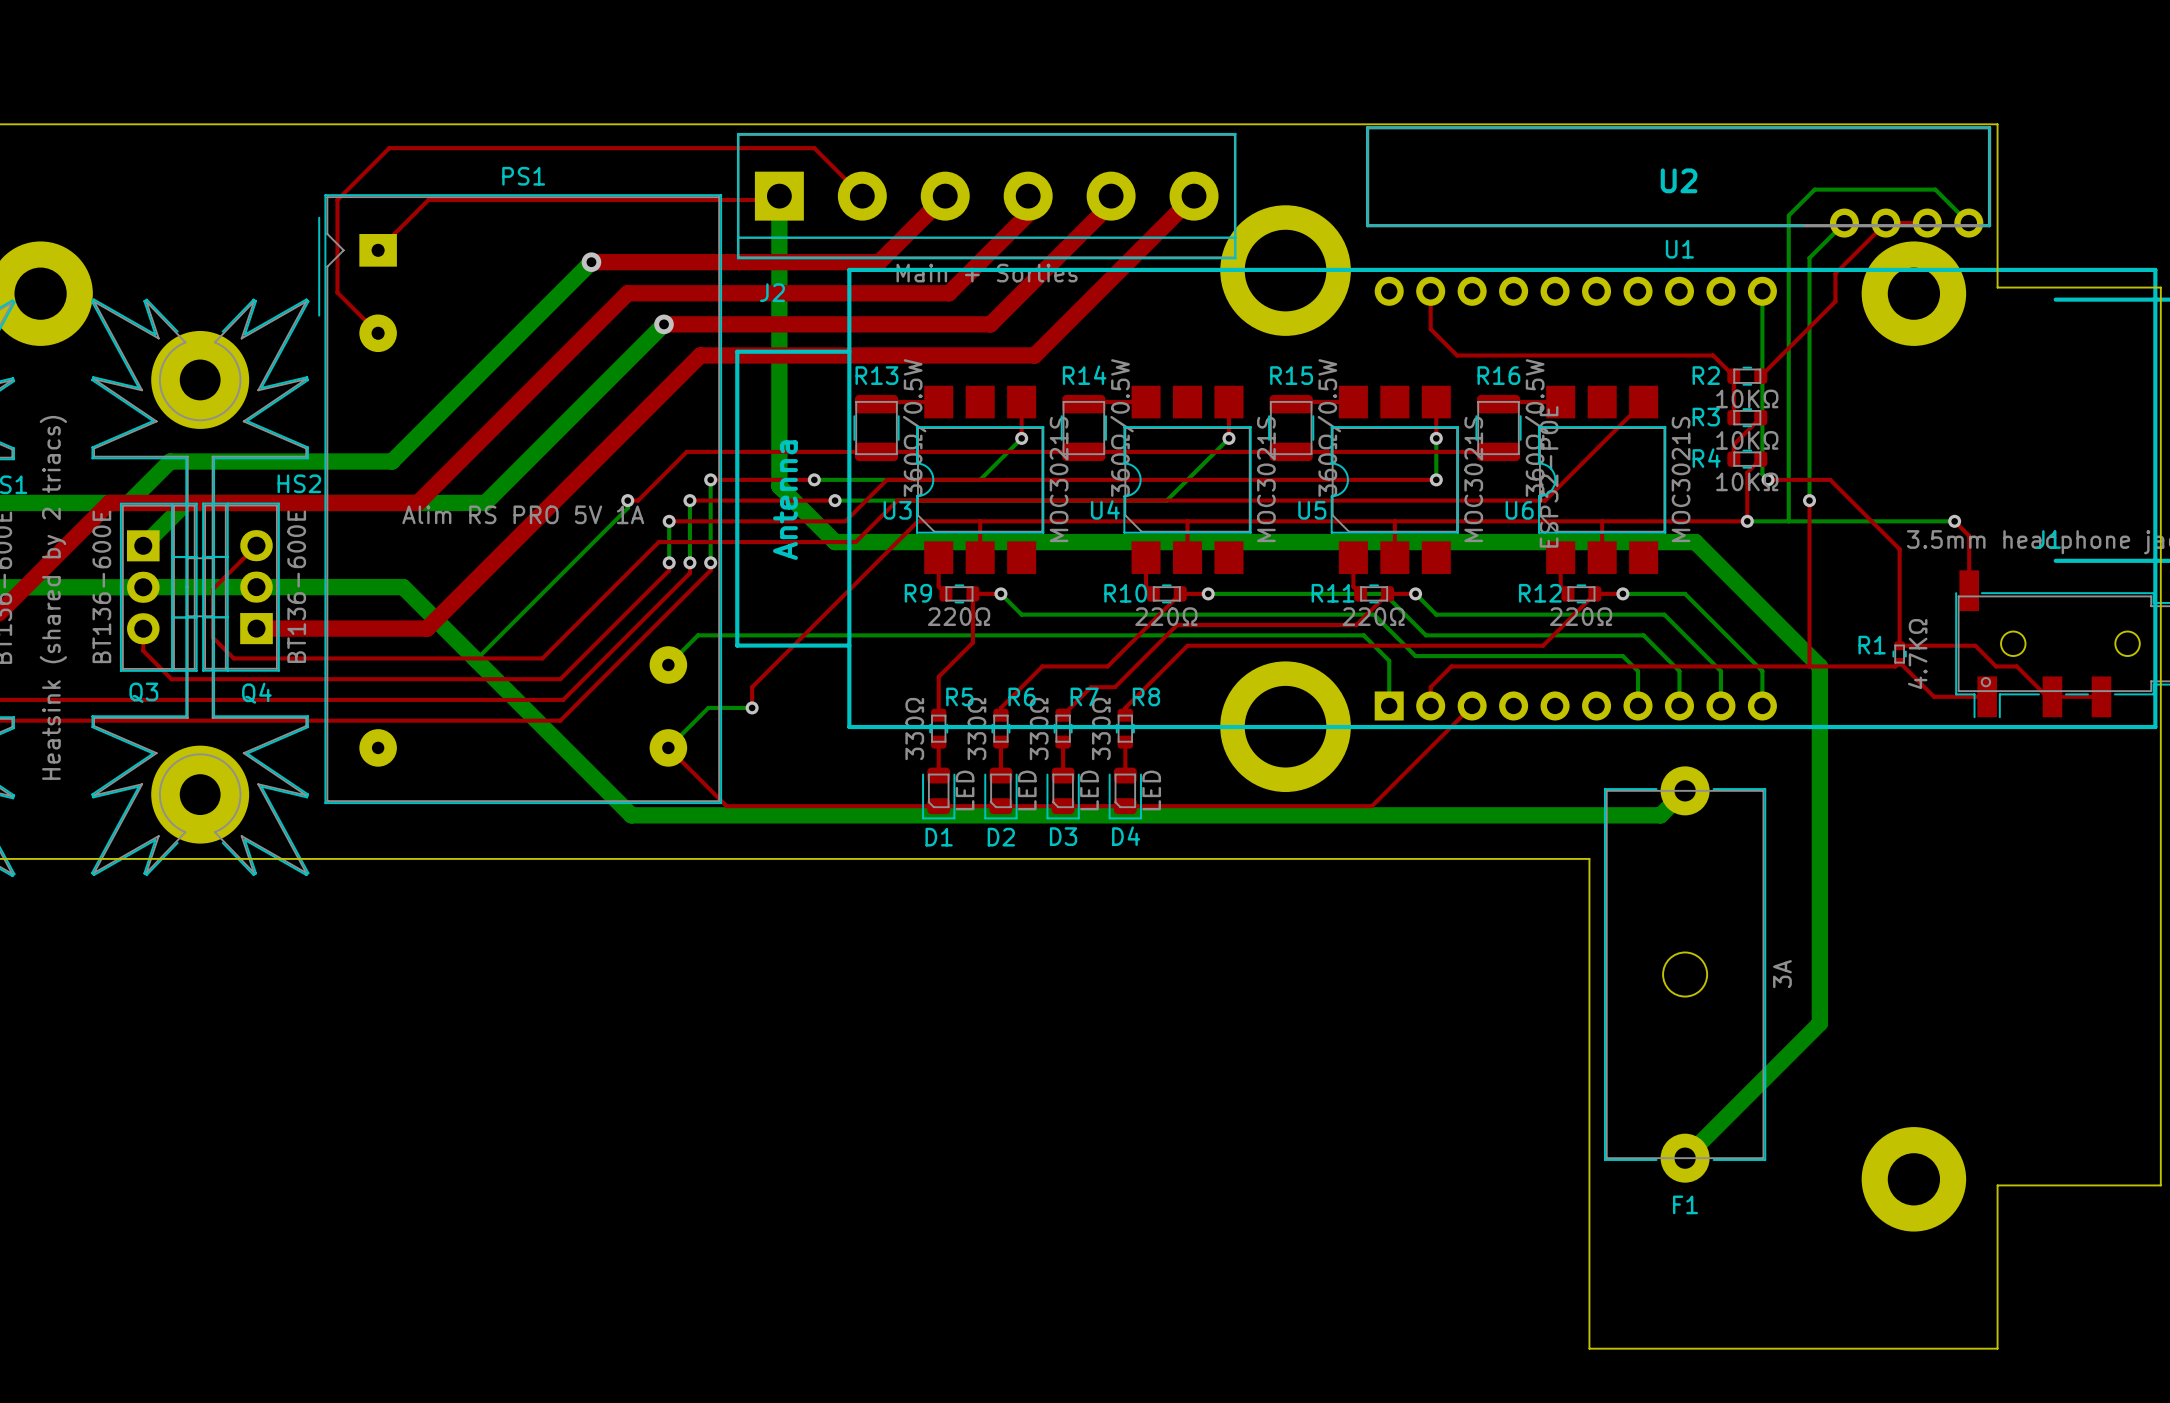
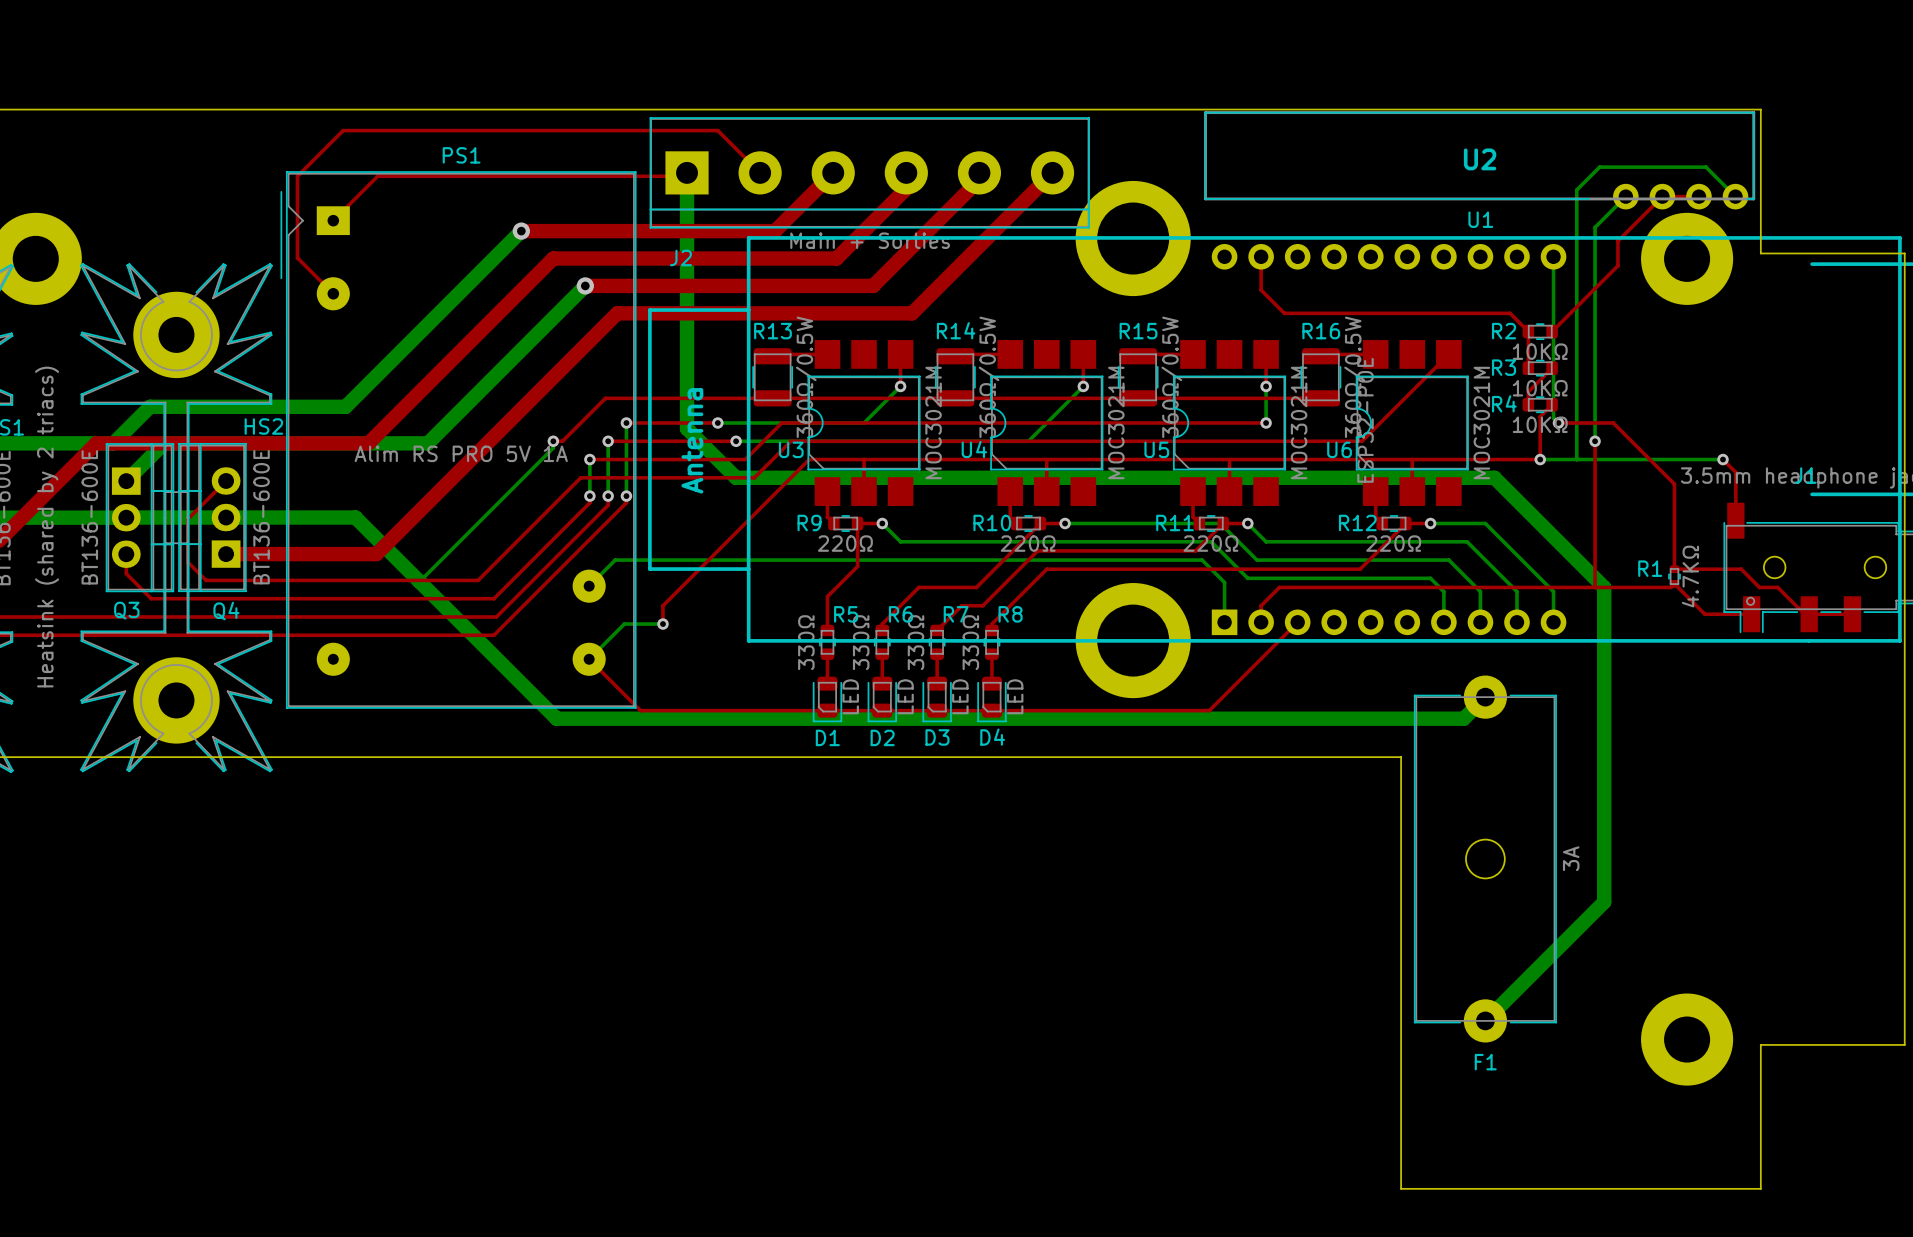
U3 value: MOC3021S (1059, 479) -> MOC3021M (933, 422)
U4 value: MOC3021S (1266, 479) -> MOC3021M (1116, 422)
U5 value: MOC3021S (1473, 479) -> MOC3021M (1299, 422)
U6 value: MOC3021S (1681, 479) -> MOC3021M (1481, 422)

